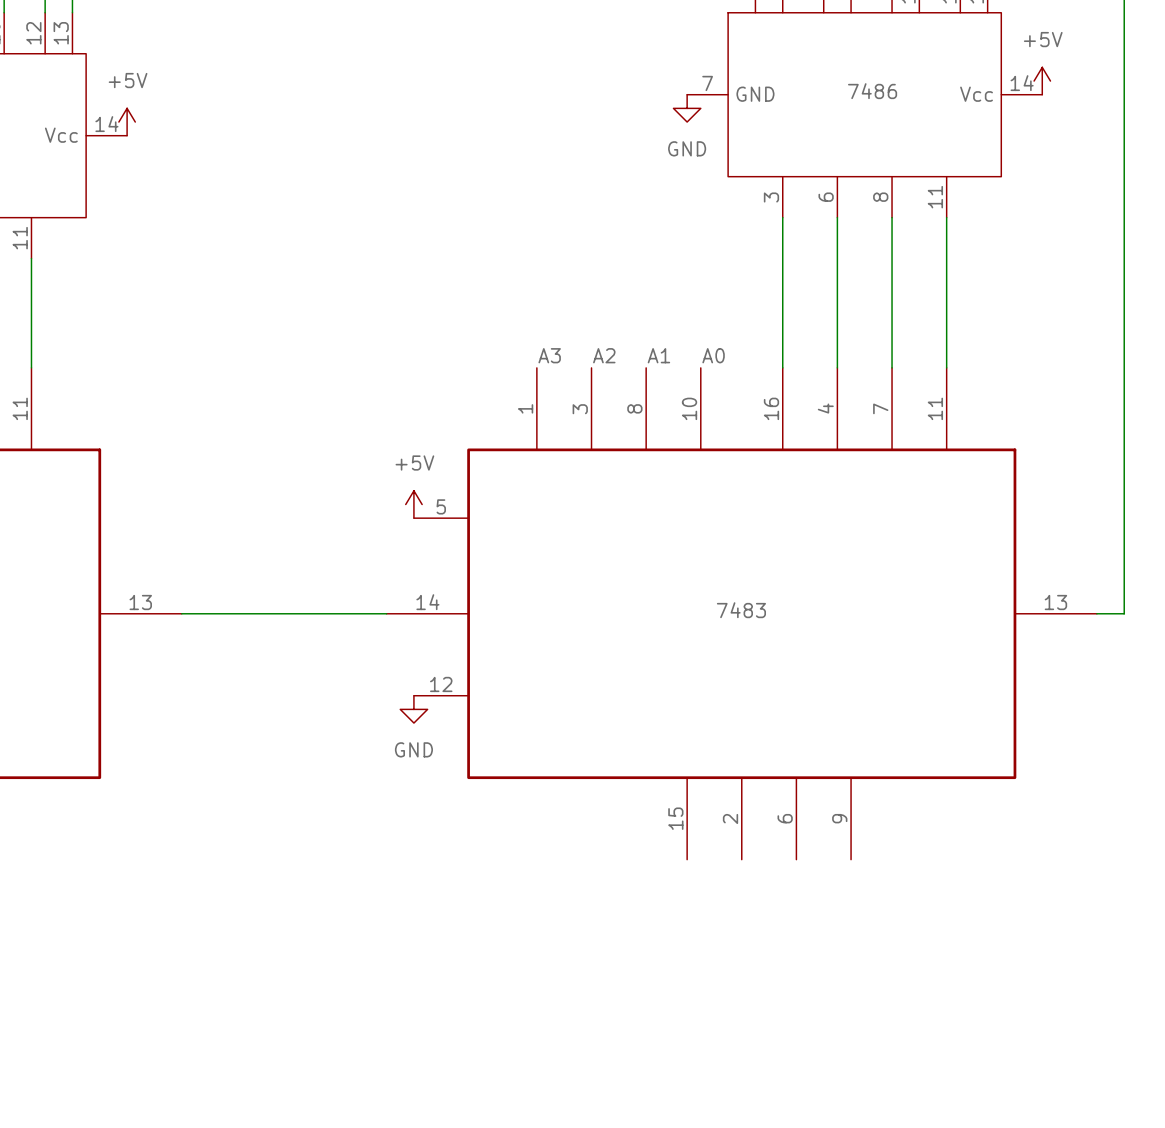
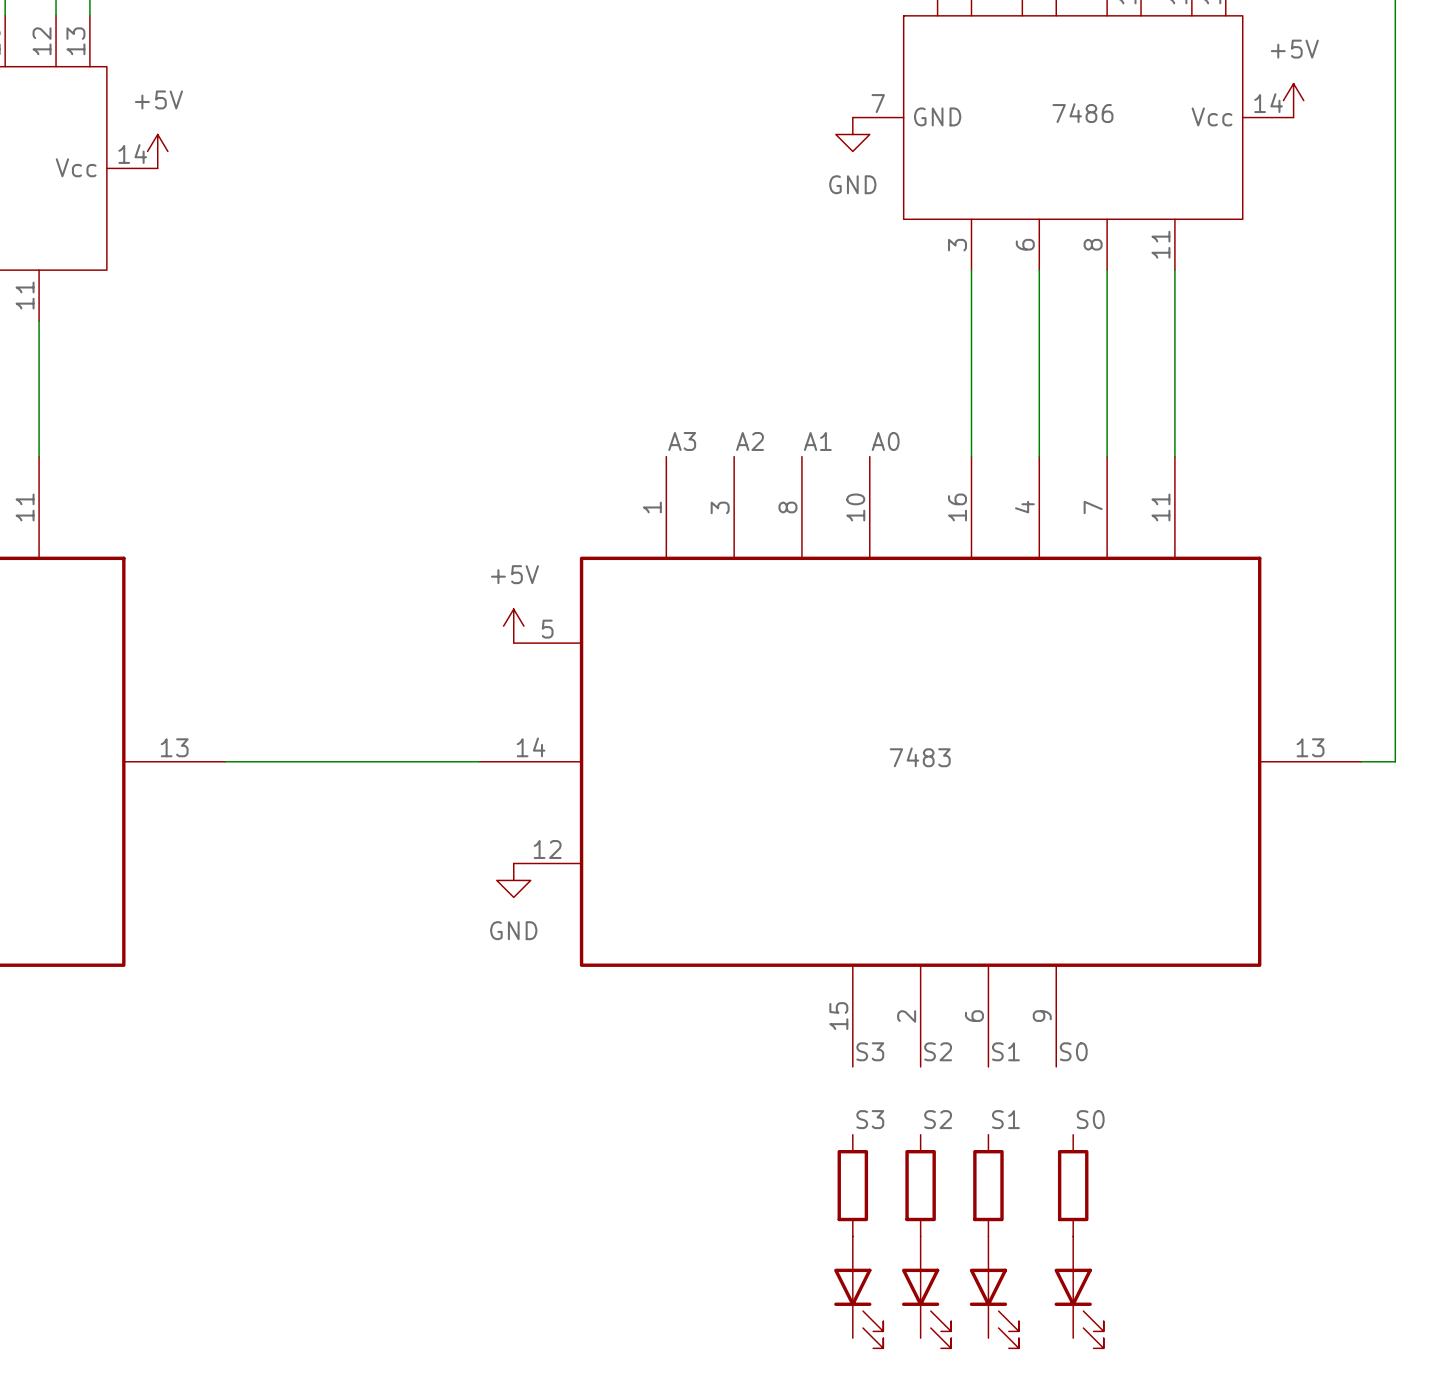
label: none -> S3 (870, 1051)
label: none -> S2 (938, 1051)
label: none -> S1 (1005, 1051)
label: none -> S0 (1073, 1051)
label: none -> S3 (870, 1119)
label: none -> S2 (938, 1119)
label: none -> S1 (1005, 1119)
label: none -> S0 (1090, 1119)
part: none -> (852, 1185)
part: none -> (920, 1185)
part: none -> (988, 1185)
part: none -> (1073, 1185)
part: none -> (858, 1292)
part: none -> (926, 1292)
part: none -> (994, 1292)
part: none -> (1079, 1292)

